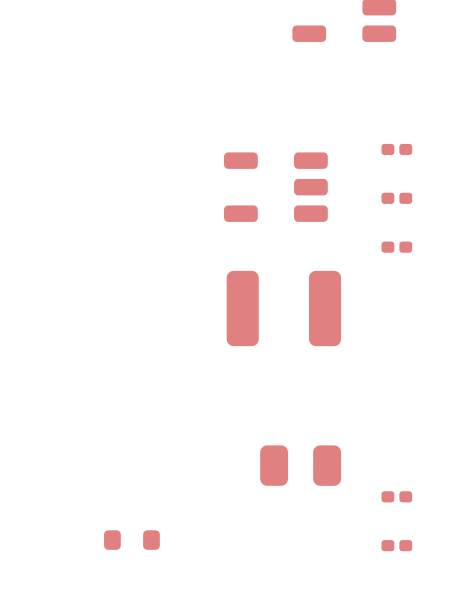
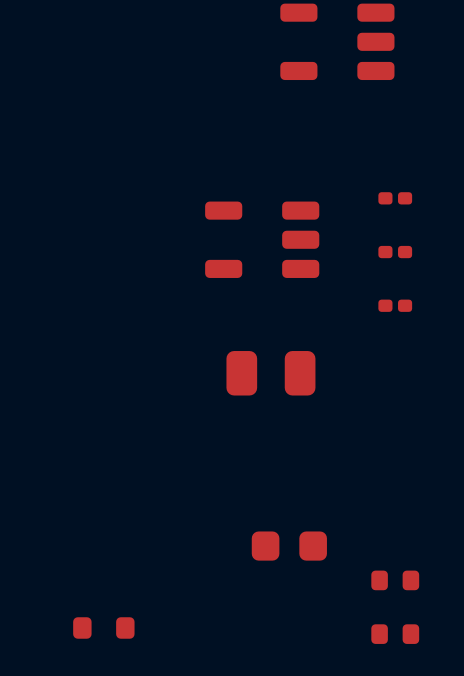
part footprint: [226, 270, 342, 347] -> [226, 351, 316, 396]
part footprint: [260, 445, 342, 486] -> [251, 531, 327, 561]
part footprint: [381, 491, 413, 503] -> [371, 570, 420, 591]
part footprint: [381, 540, 413, 552] -> [371, 624, 420, 644]

